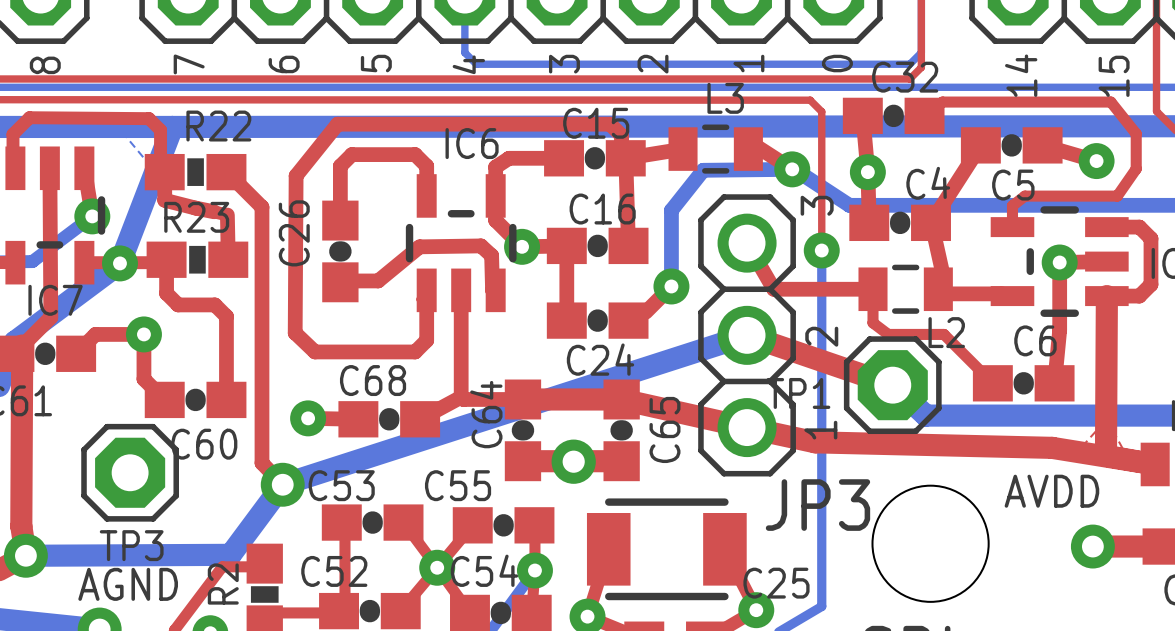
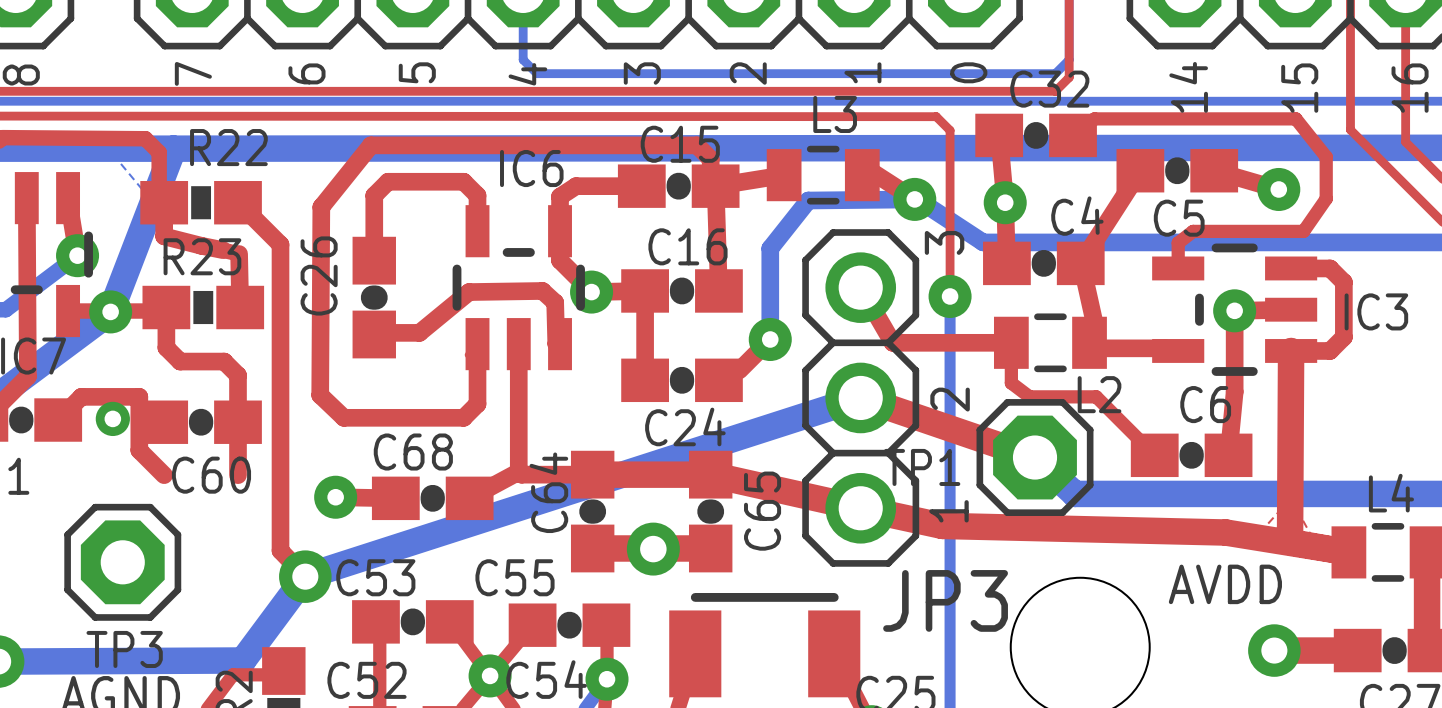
via position: (143, 334) -> (112, 418)
C60 position: (195, 399) -> (201, 422)

